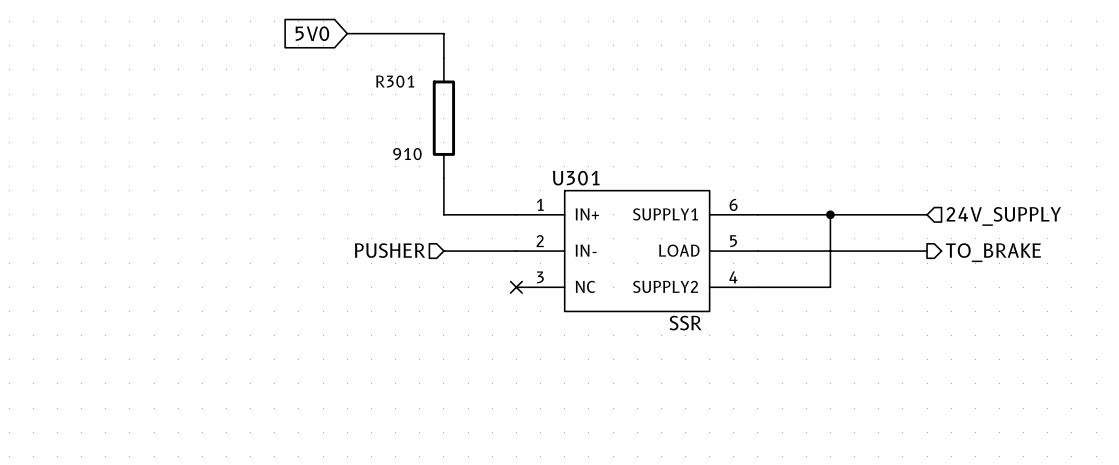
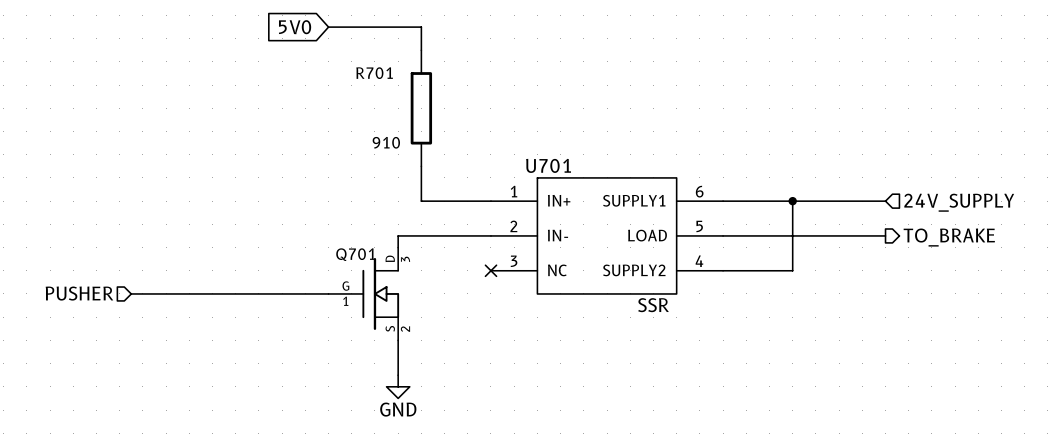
R301 name: R301 (395, 81) -> R701 (374, 73)
U301 name: U301 (576, 178) -> U701 (548, 165)
hierarchical label: PUSHER (389, 250) -> none
wire: none -> (421, 235) (398, 235) (398, 247)
hierarchical label: none -> PUSHER (79, 293)
wire: none -> (131, 293) (328, 293)
Q701: none -> (363, 293)
wire: none -> (398, 340) (398, 375)
power symbol: none -> GND (398, 386)

